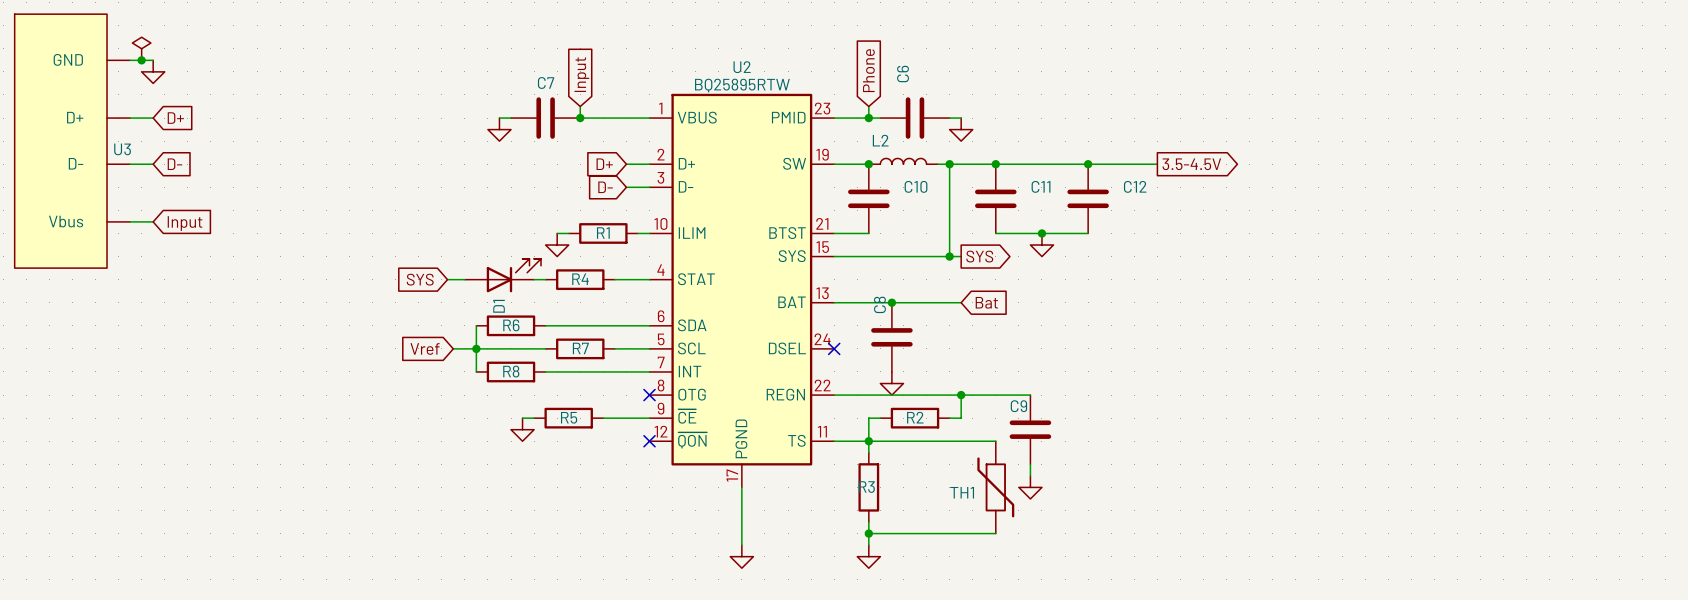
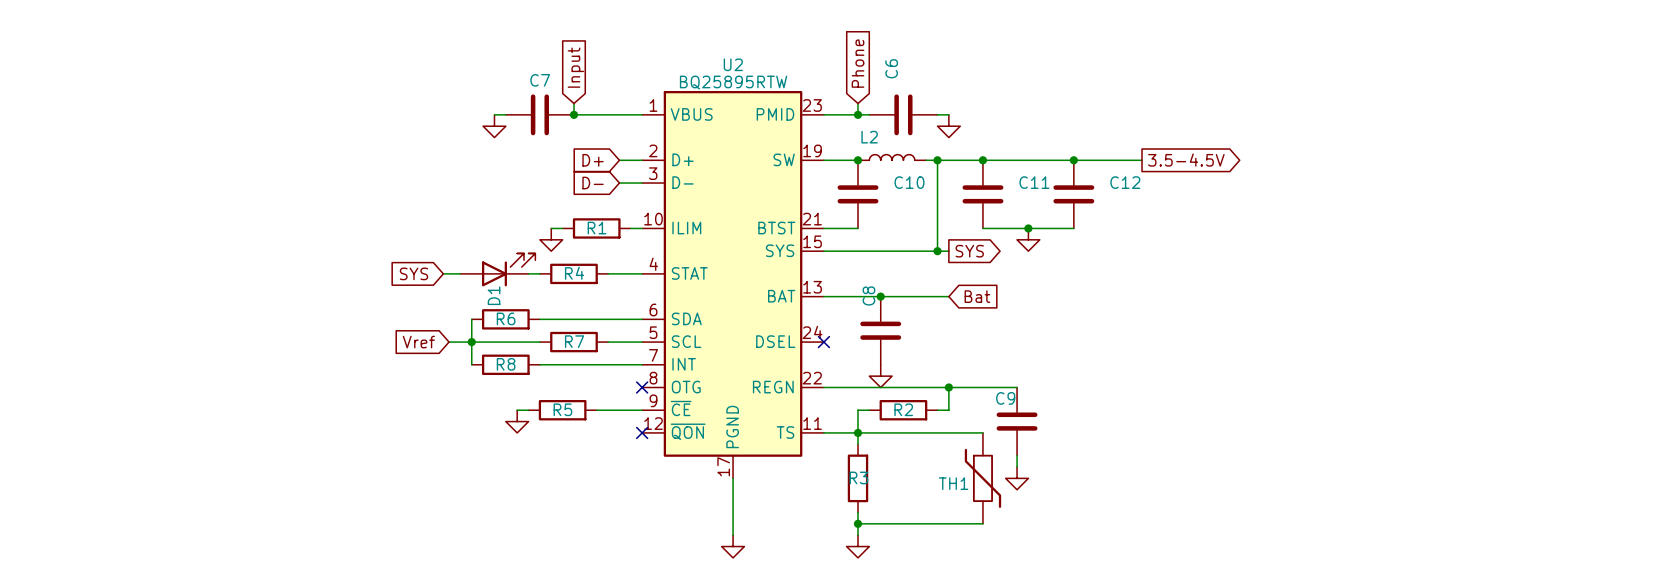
power symbol: (141, 48) -> none
wire: (130, 60) (153, 60) -> none
junction: (141, 60) -> none
power symbol: (153, 71) -> none
wire: (130, 118) (153, 118) -> none
global label: D+ (175, 118) -> none
U3: (72, 141) -> none
wire: (130, 164) (153, 164) -> none
global label: D- (174, 164) -> none
wire: (130, 221) (153, 221) -> none
global label: Input (185, 223) -> none

